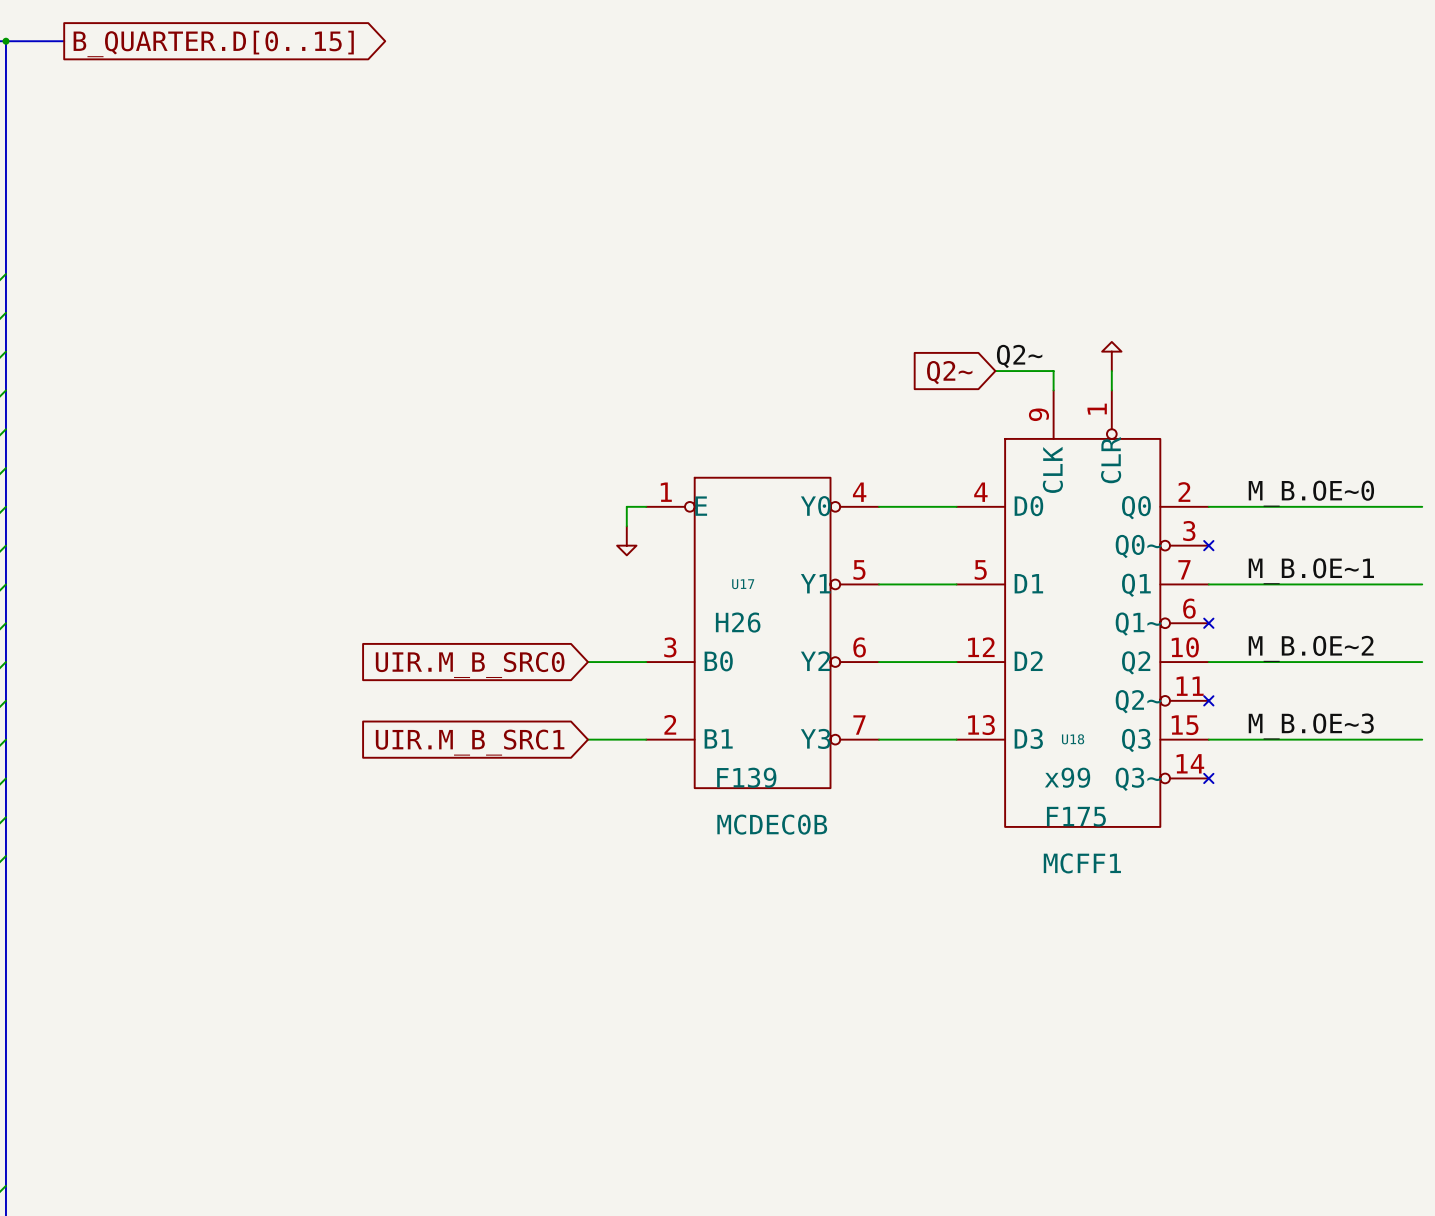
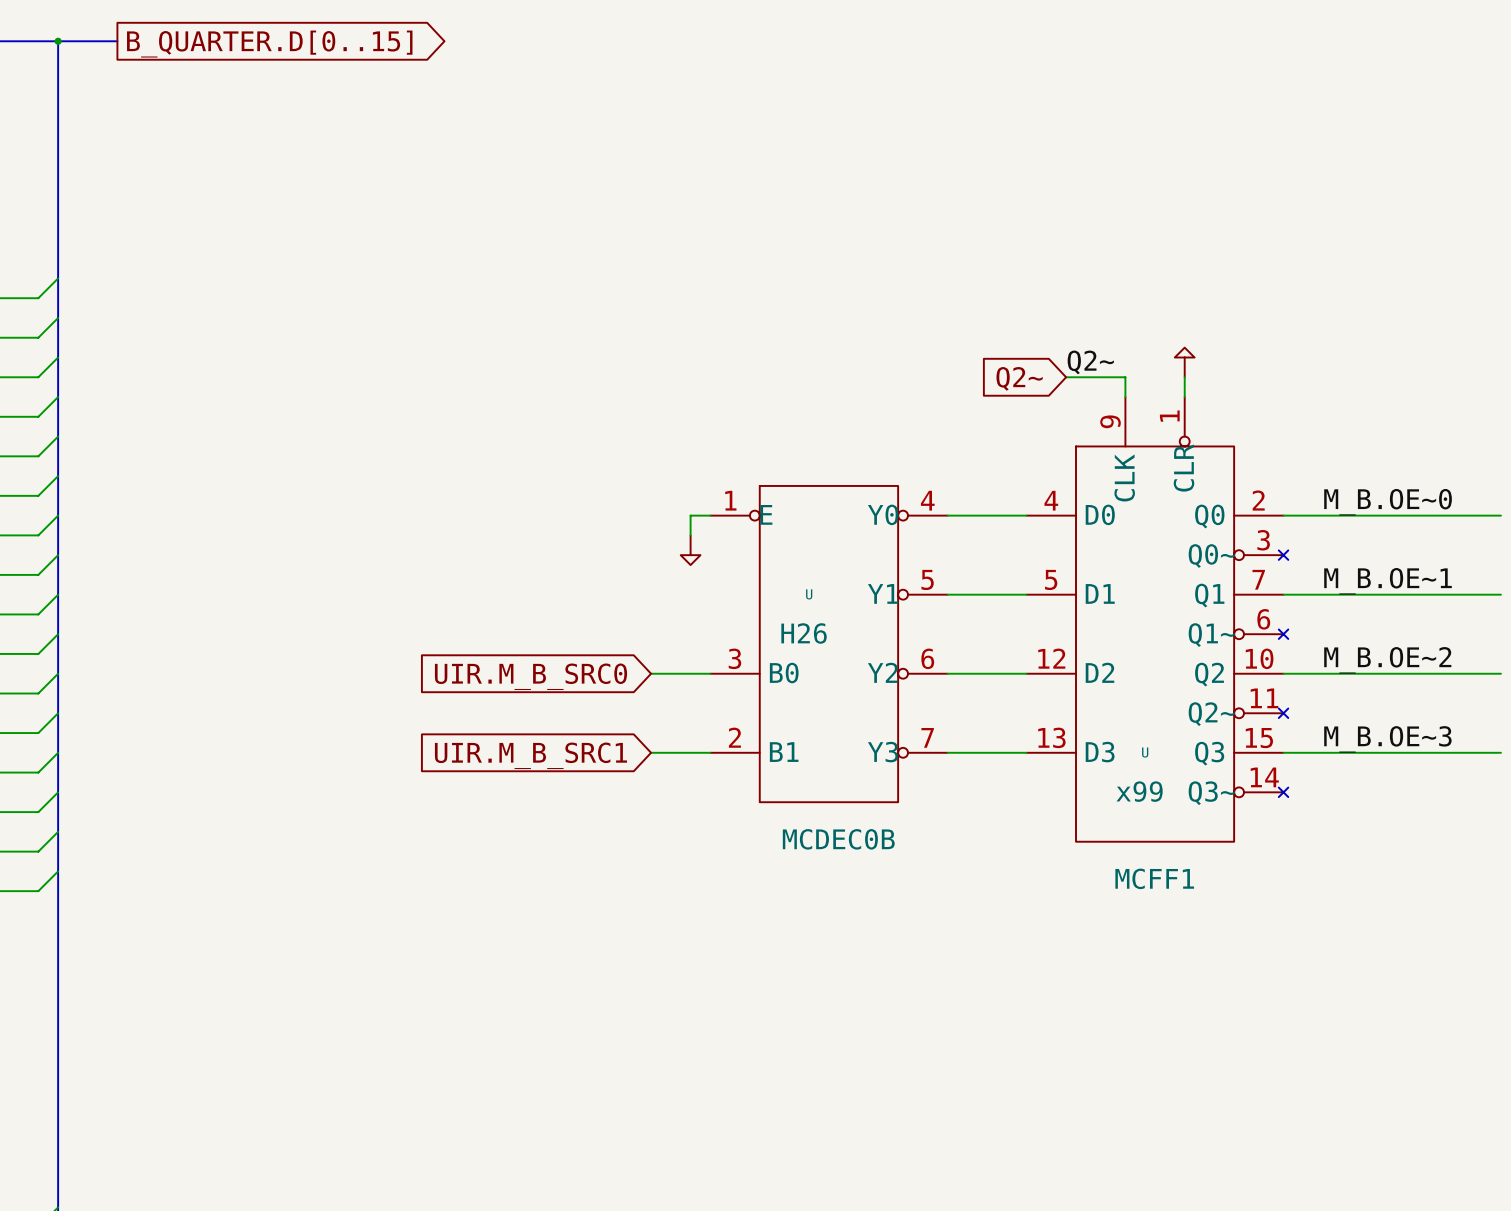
U17 name: U17 (743, 584) -> U (809, 594)
U18 name: U18 (1073, 739) -> U (1145, 752)
U17 value: F139 (746, 777) -> none
U18 value: F175 (1076, 816) -> none

